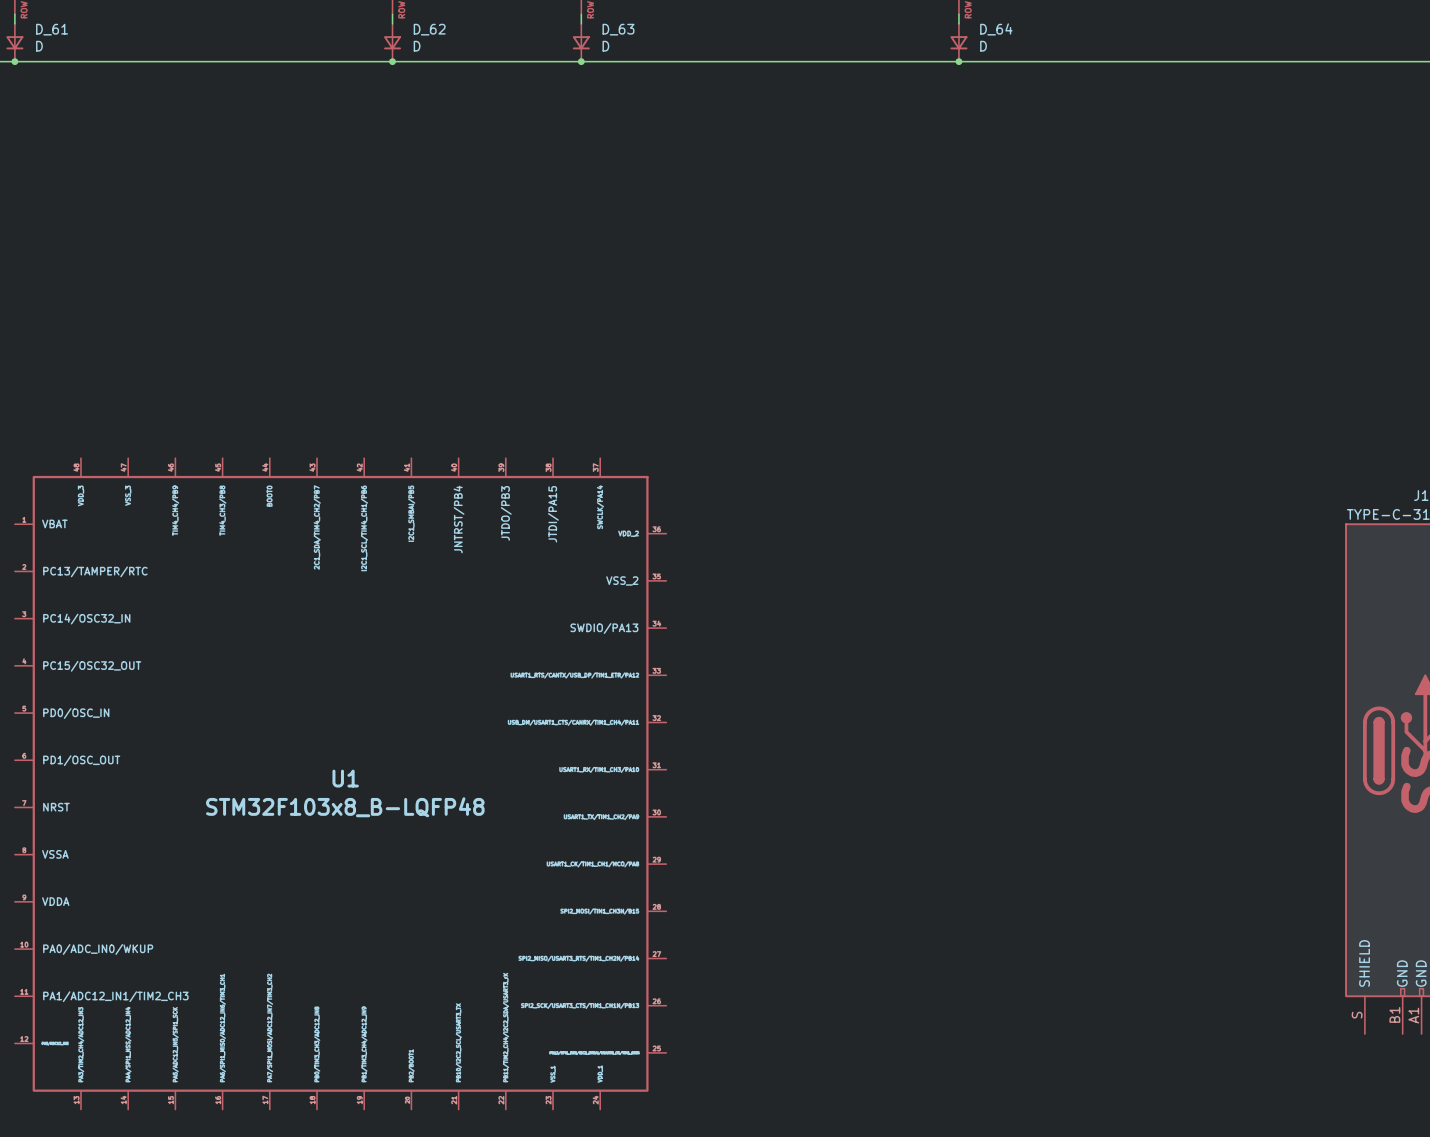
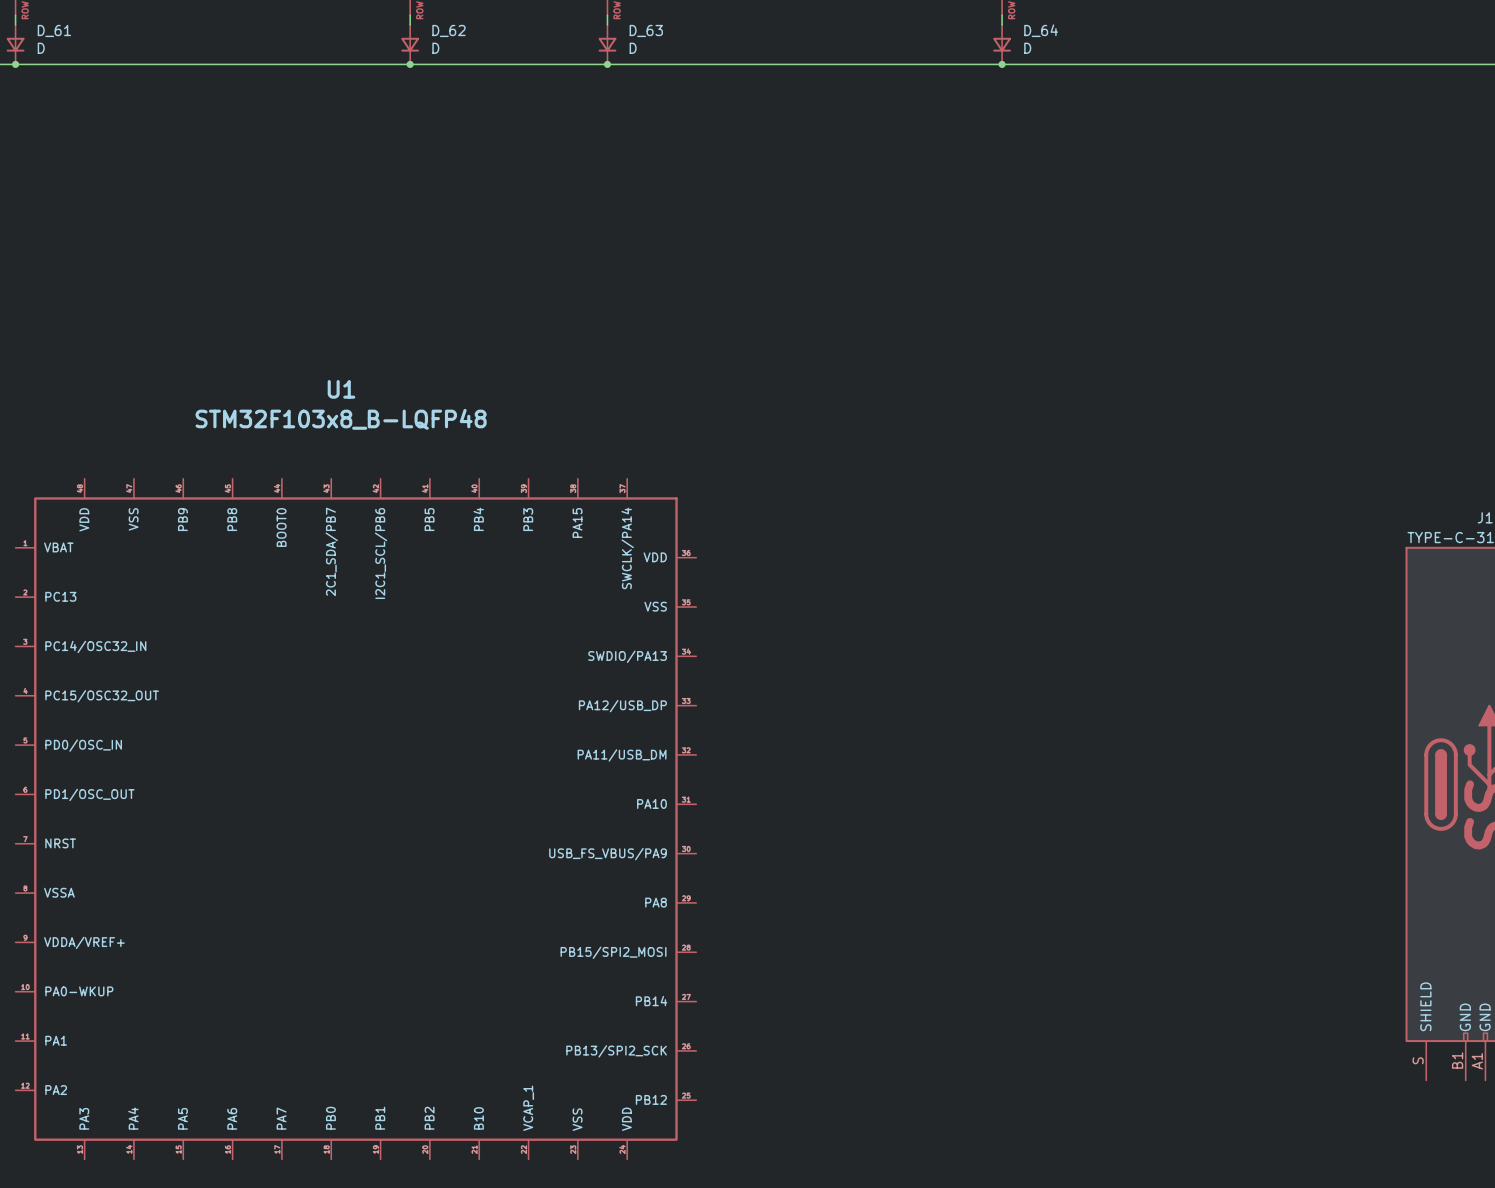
U1 symbol: [14, 458, 667, 1110] -> [15, 478, 697, 1160]
U1 name position: U1 (345, 778) -> U1 (341, 389)
U1 value position: STM32F103x8_B-LQFP48 (345, 807) -> STM32F103x8_B-LQFP48 (341, 419)

